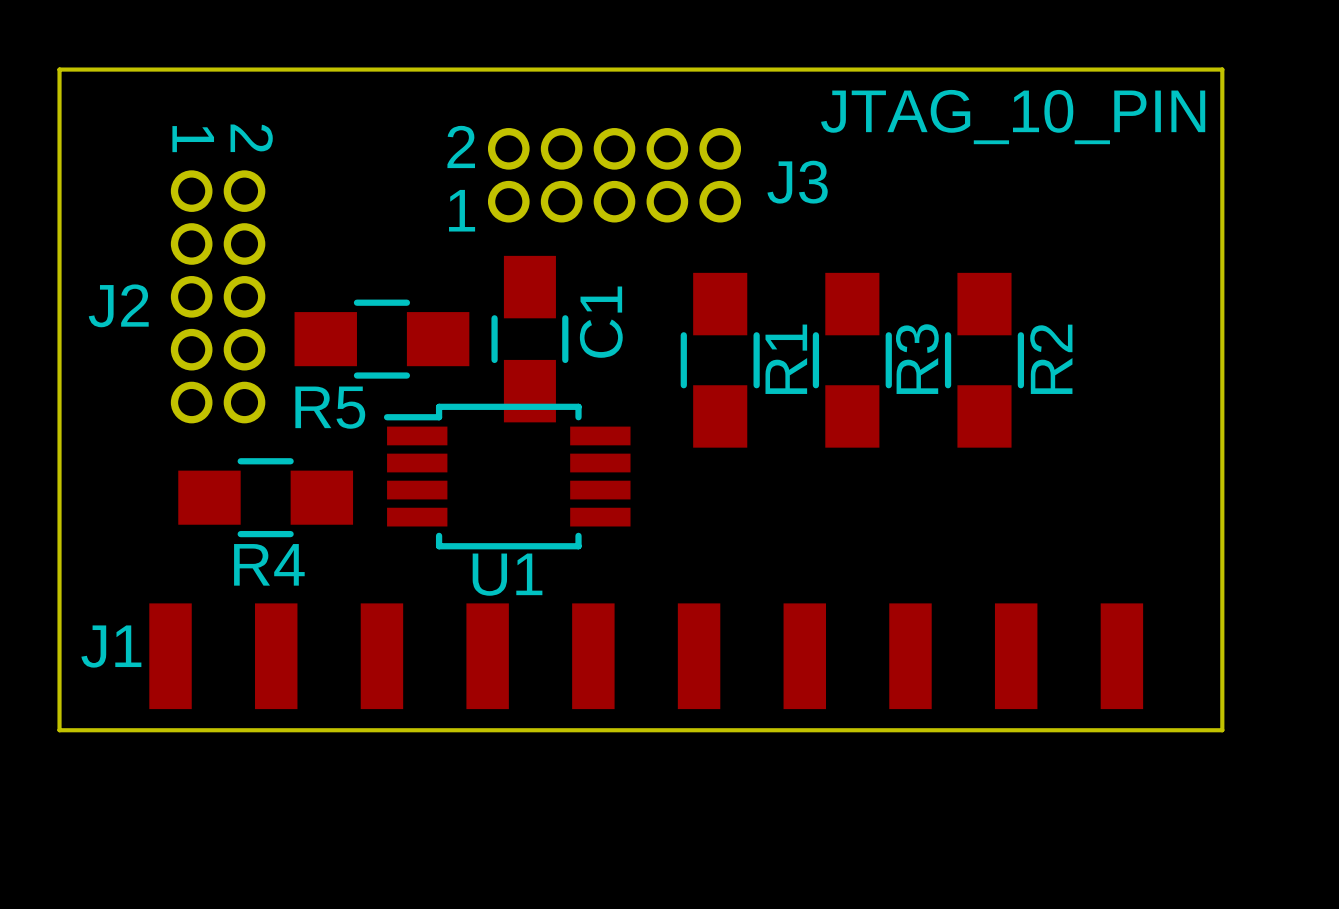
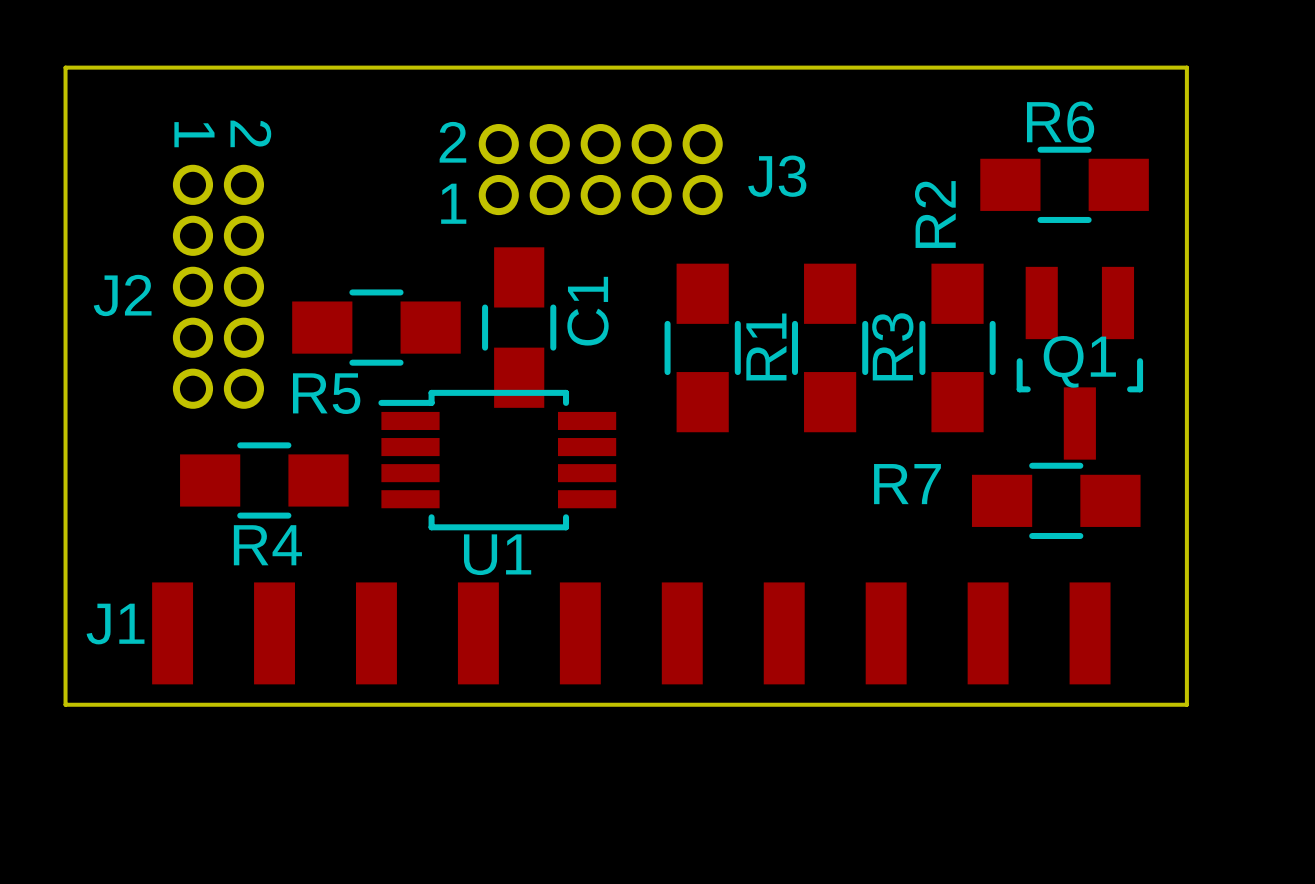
J3 value: JTAG_10_PIN (1013, 117) -> none
R6: none -> (1064, 184)
R2 name position: R2 (1051, 359) -> R2 (935, 214)
Q1: none -> (1079, 363)
R7: none -> (1056, 500)

